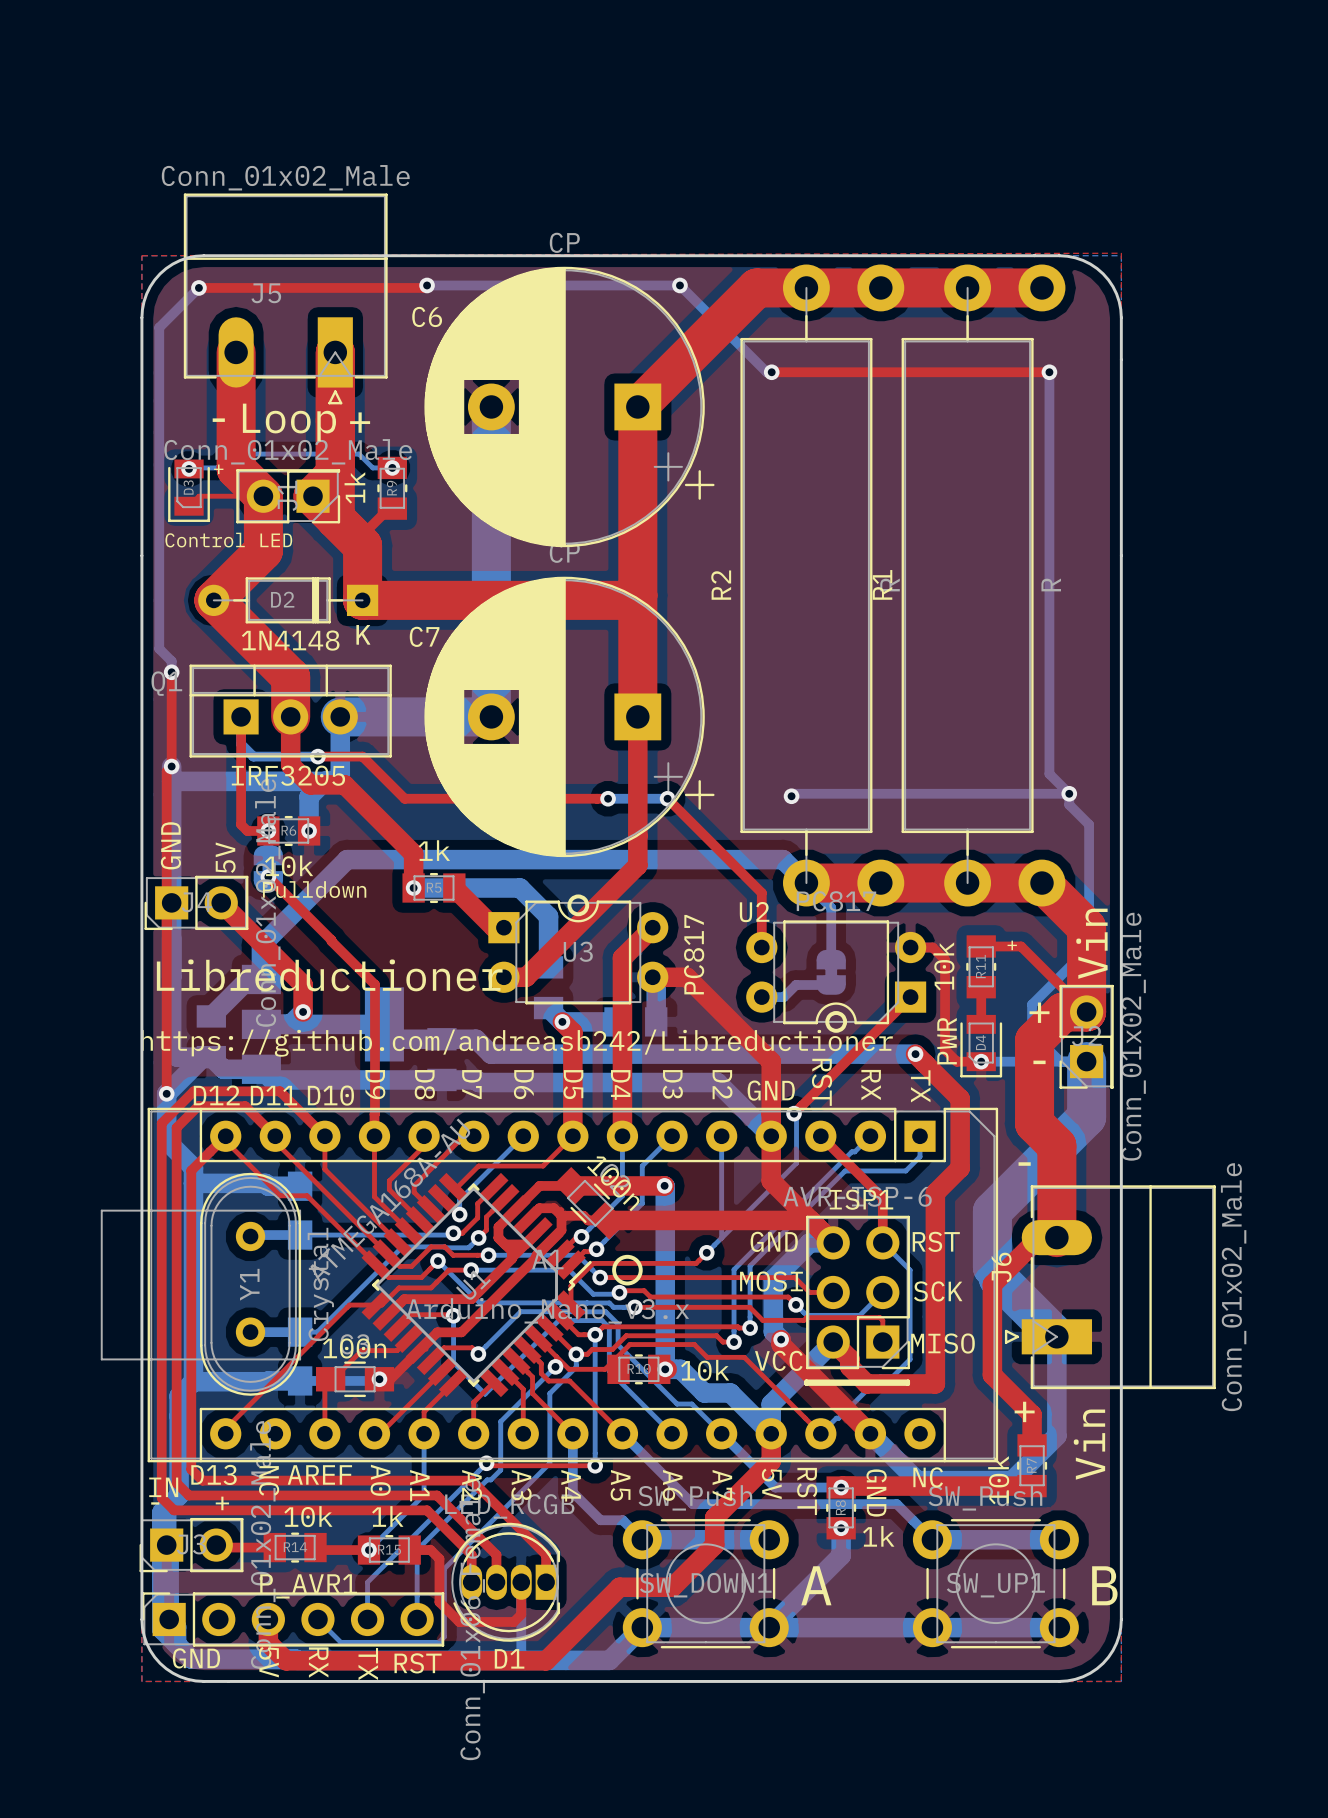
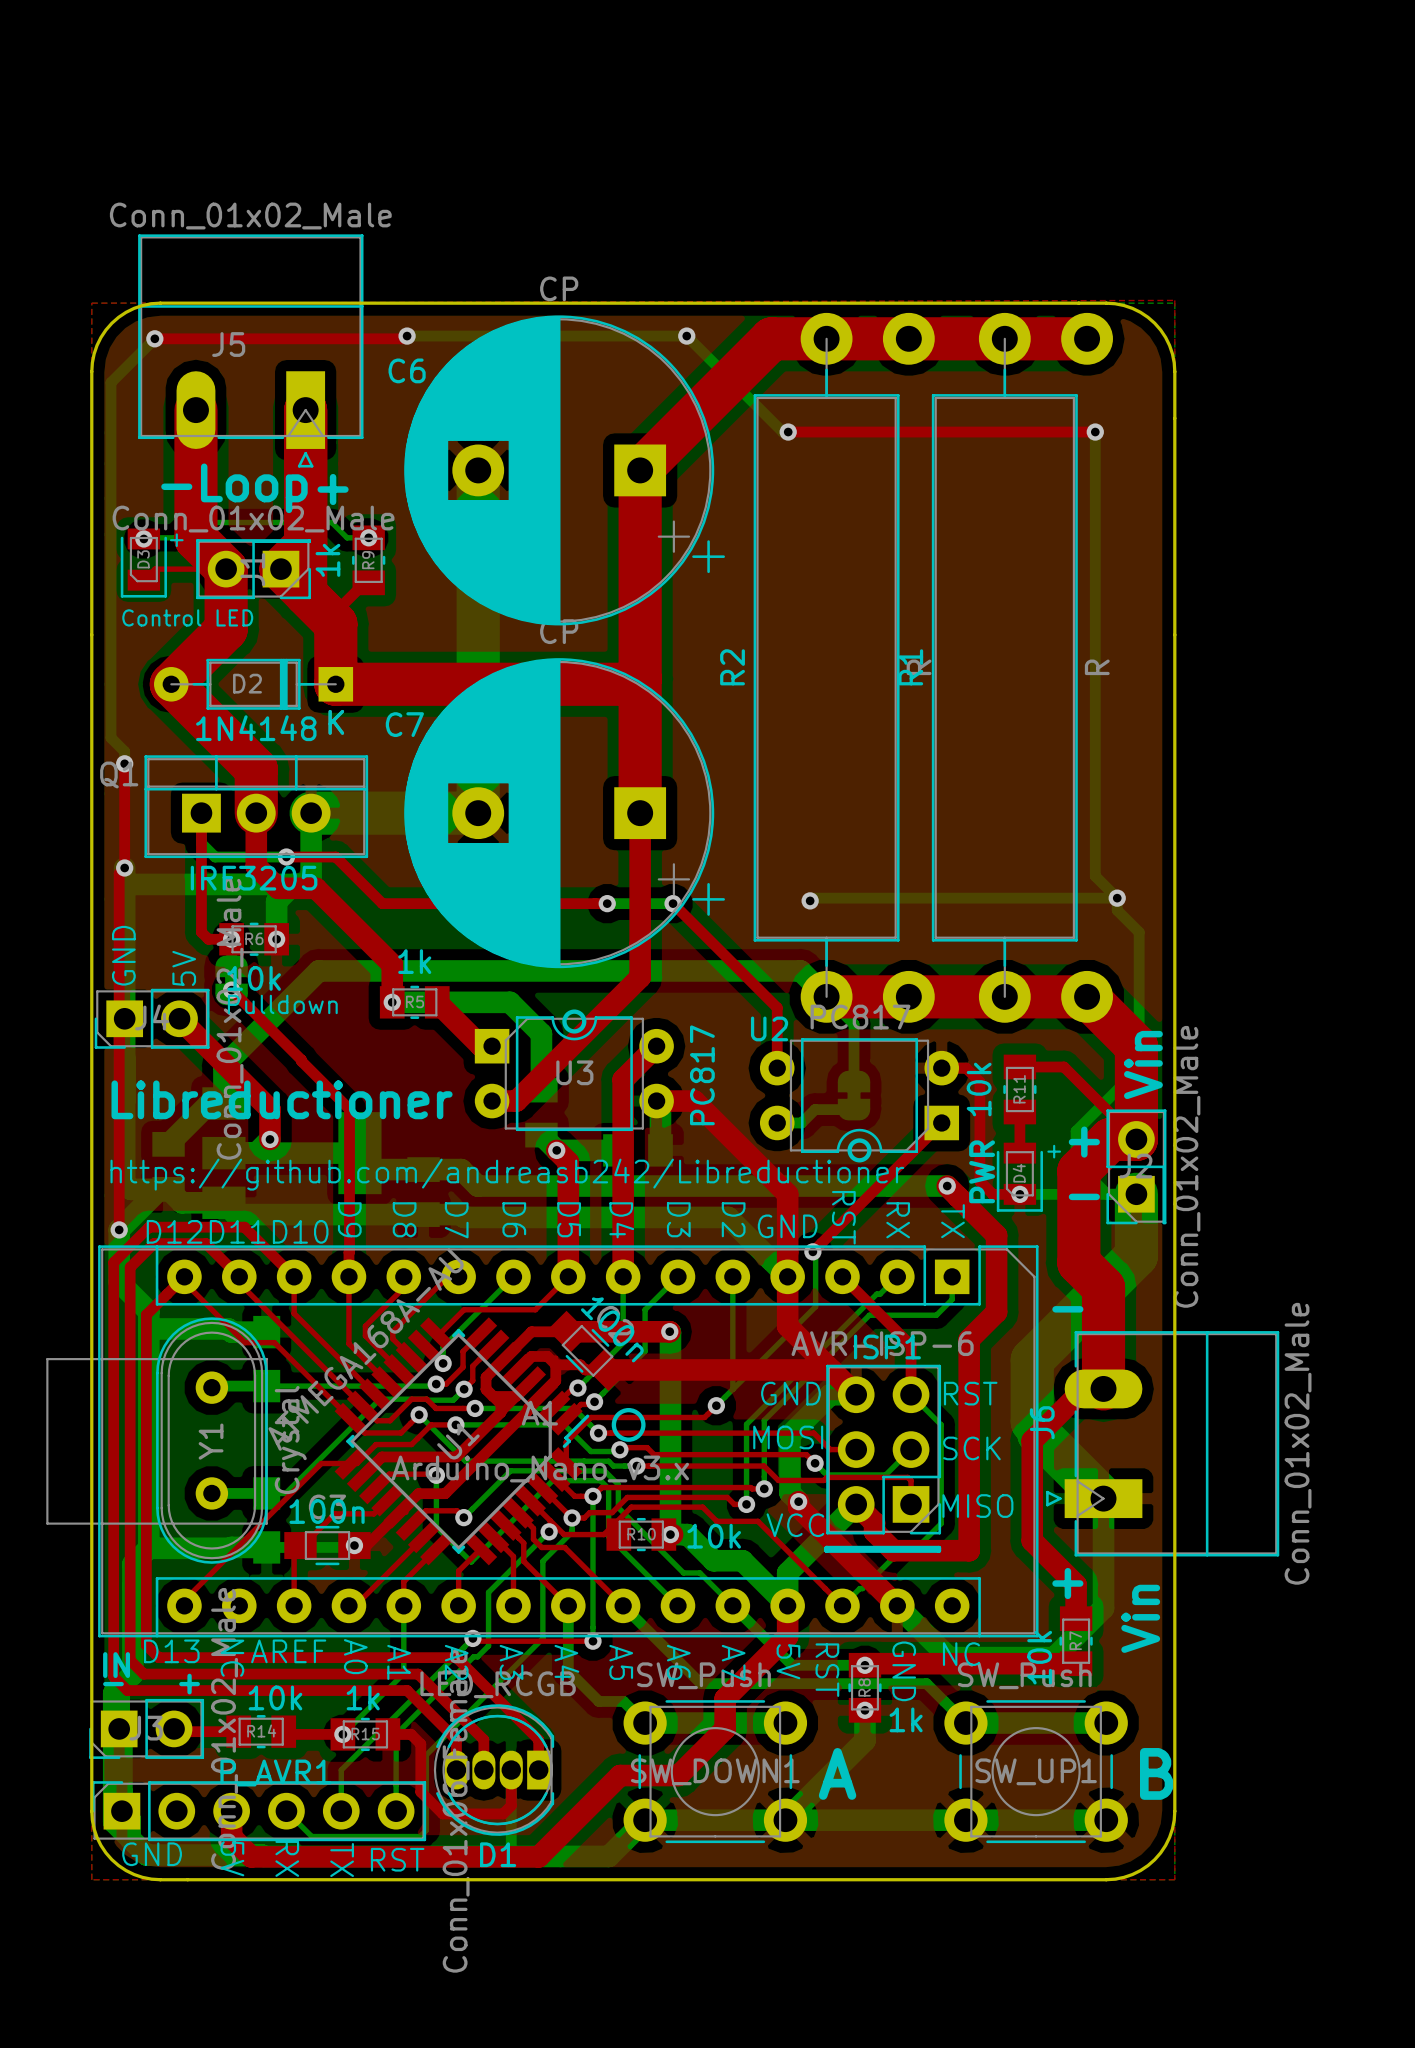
text position: + (1012, 945) -> + (1054, 1151)

